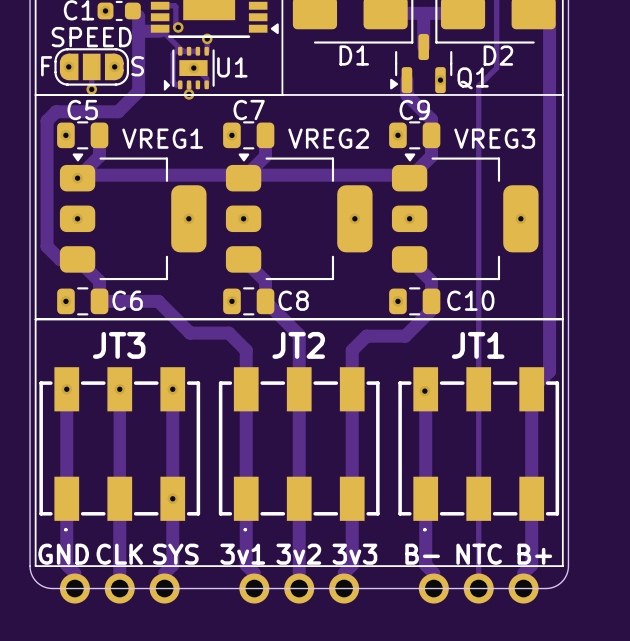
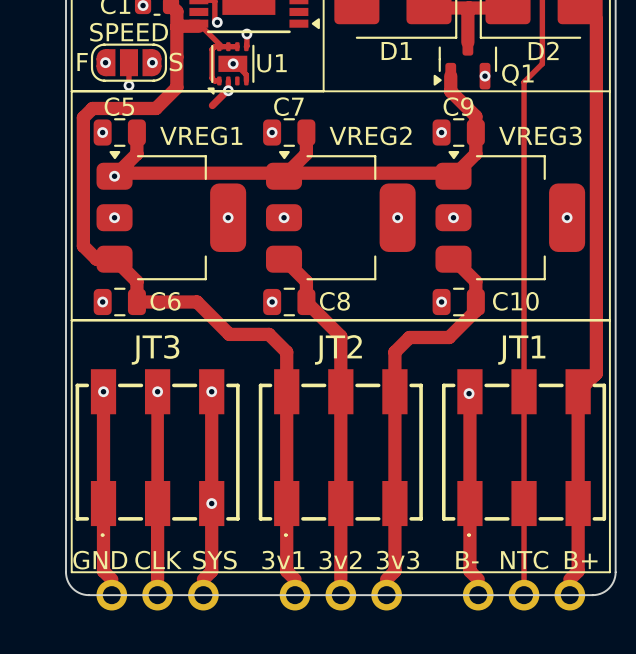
U1 footprint: [163, 46, 215, 91] -> [207, 42, 255, 95]
track: none -> (227, 90) (212, 105)

